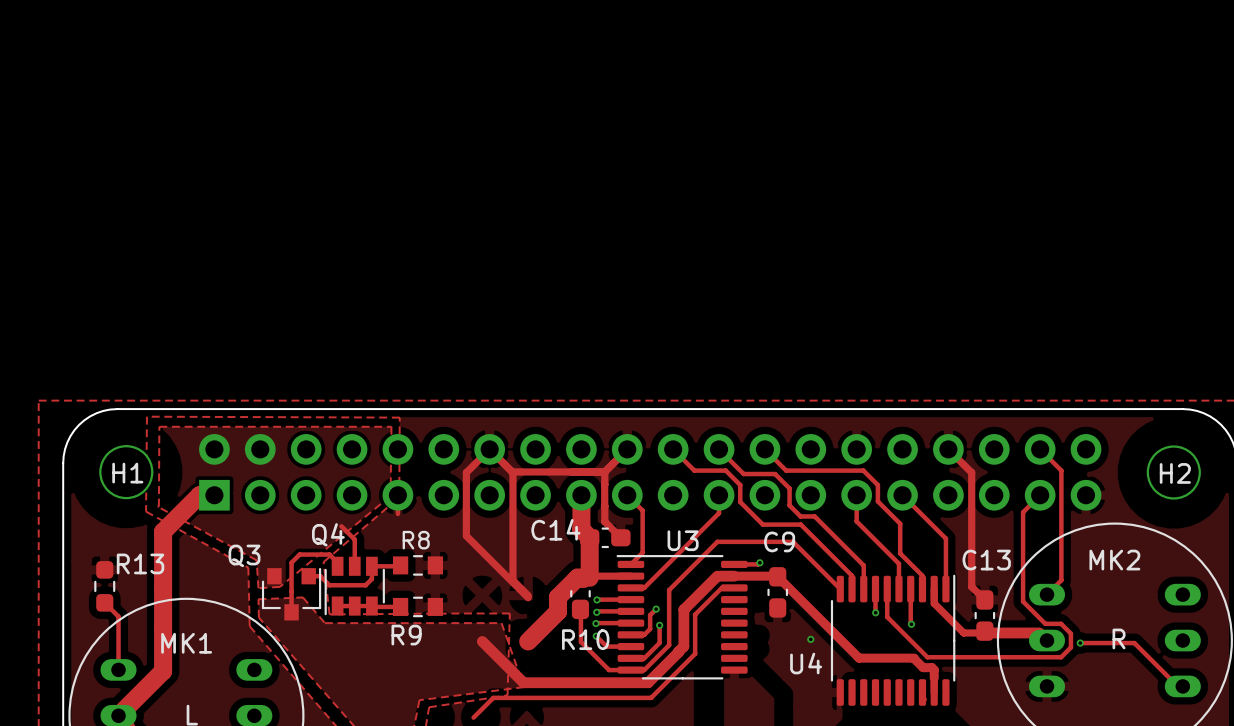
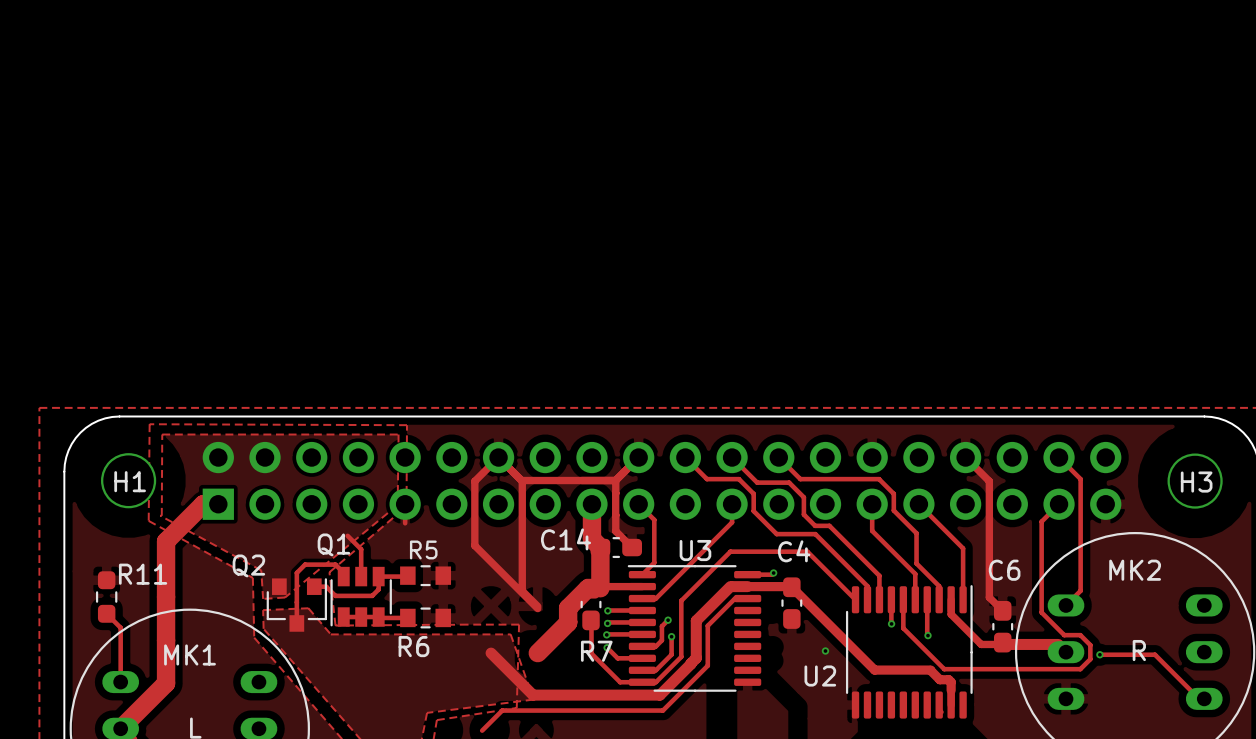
H2 name: H2 (1175, 473) -> H3 (1196, 482)
Q4 name: Q4 (328, 534) -> Q1 (333, 544)
R8 name: R8 (416, 540) -> R5 (423, 549)
C9 name: C9 (779, 541) -> C4 (794, 551)
Q3 name: Q3 (244, 555) -> Q2 (248, 565)
C13 name: C13 (986, 560) -> C6 (1004, 570)
R13 name: R13 (140, 563) -> R11 (143, 574)
R9 name: R9 (406, 635) -> R6 (413, 646)
R10 name: R10 (585, 639) -> R7 (596, 651)
U4 name: U4 (806, 663) -> U2 (820, 676)

